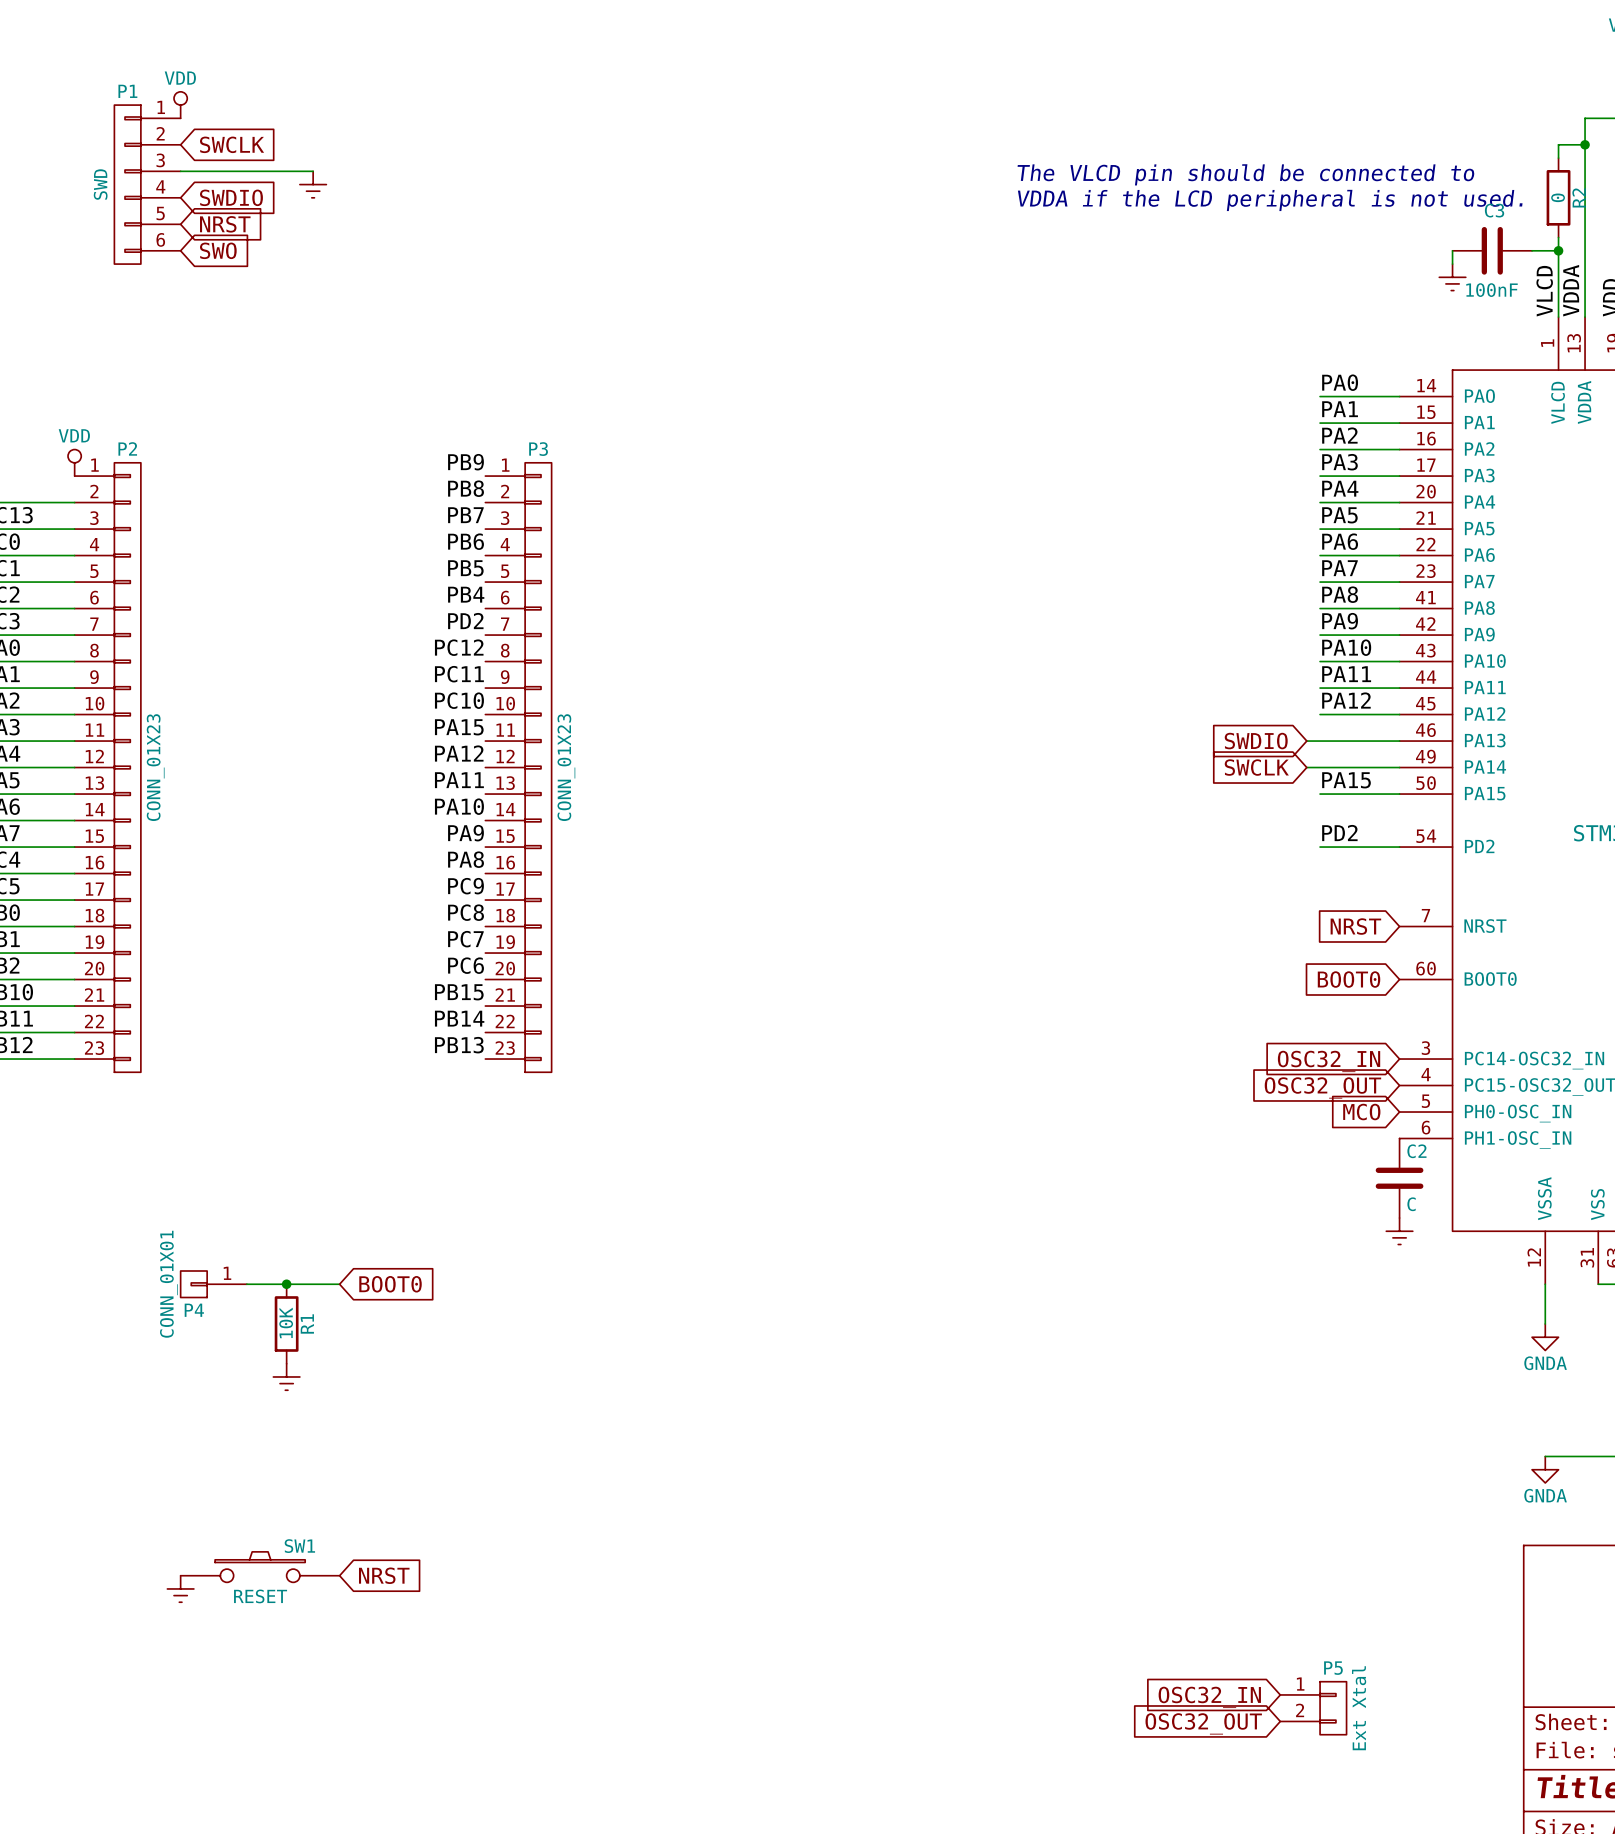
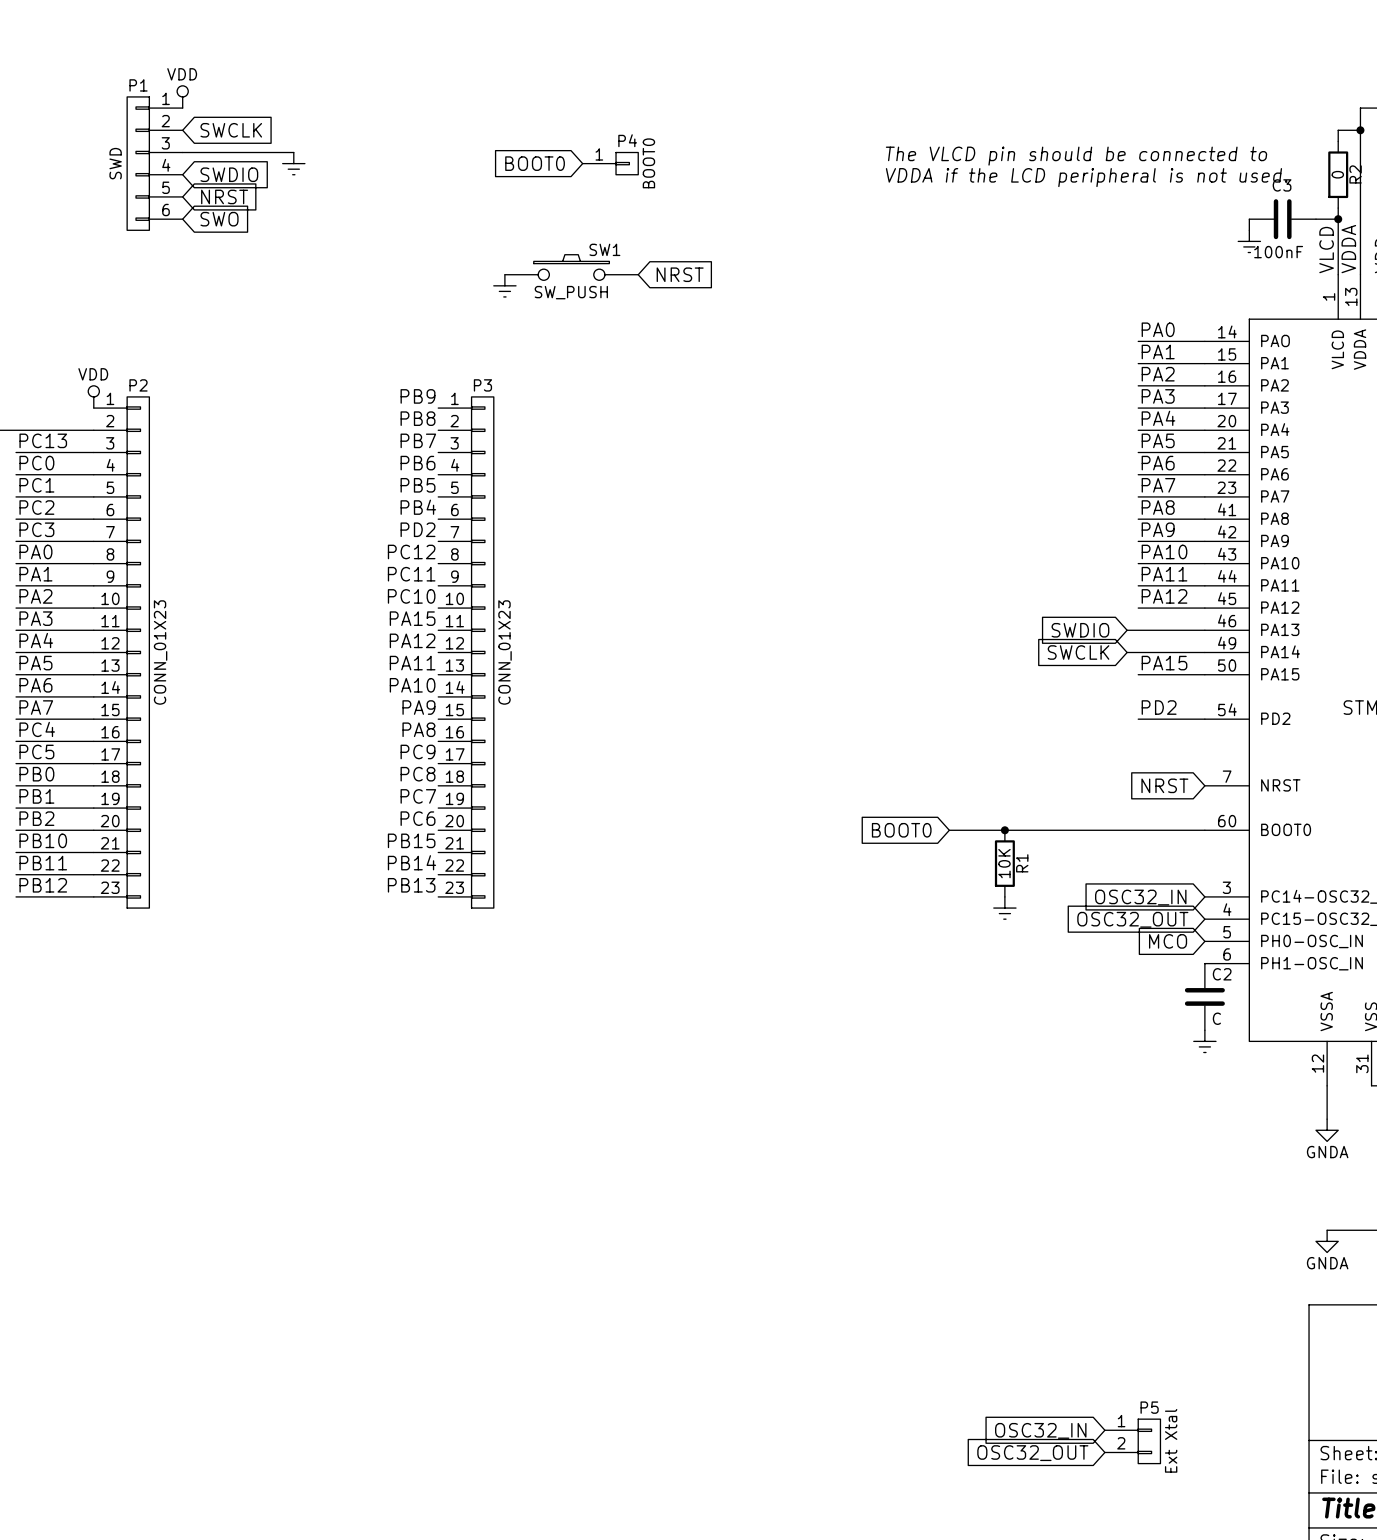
global label: none -> BOOT0 (535, 163)
global label: none -> NRST (680, 274)
power symbol: none -> (504, 285)
global label: none -> BOOT0 (901, 830)
wire: none -> (949, 830) (1204, 830)
junction: none -> (1004, 830)
global label: BOOT0 (1349, 979) -> none
power symbol: none -> (1004, 908)
P4 value: CONN_01X01 (168, 1284) -> BOOT0 (648, 163)
P4 rotation: 0° (193, 1284) -> 180° (627, 163)
P4 position: (213, 1284) -> (610, 163)
wire: (246, 1284) (339, 1284) -> none
junction: (286, 1284) -> none
global label: BOOT0 (390, 1284) -> none
R1 position: (286, 1323) -> (1004, 863)
power symbol: (286, 1376) -> none
SW1 position: (260, 1567) -> (571, 267)
global label: NRST (384, 1575) -> none
power symbol: (180, 1588) -> none
SW1 value: RESET (260, 1596) -> SW_PUSH (571, 292)

